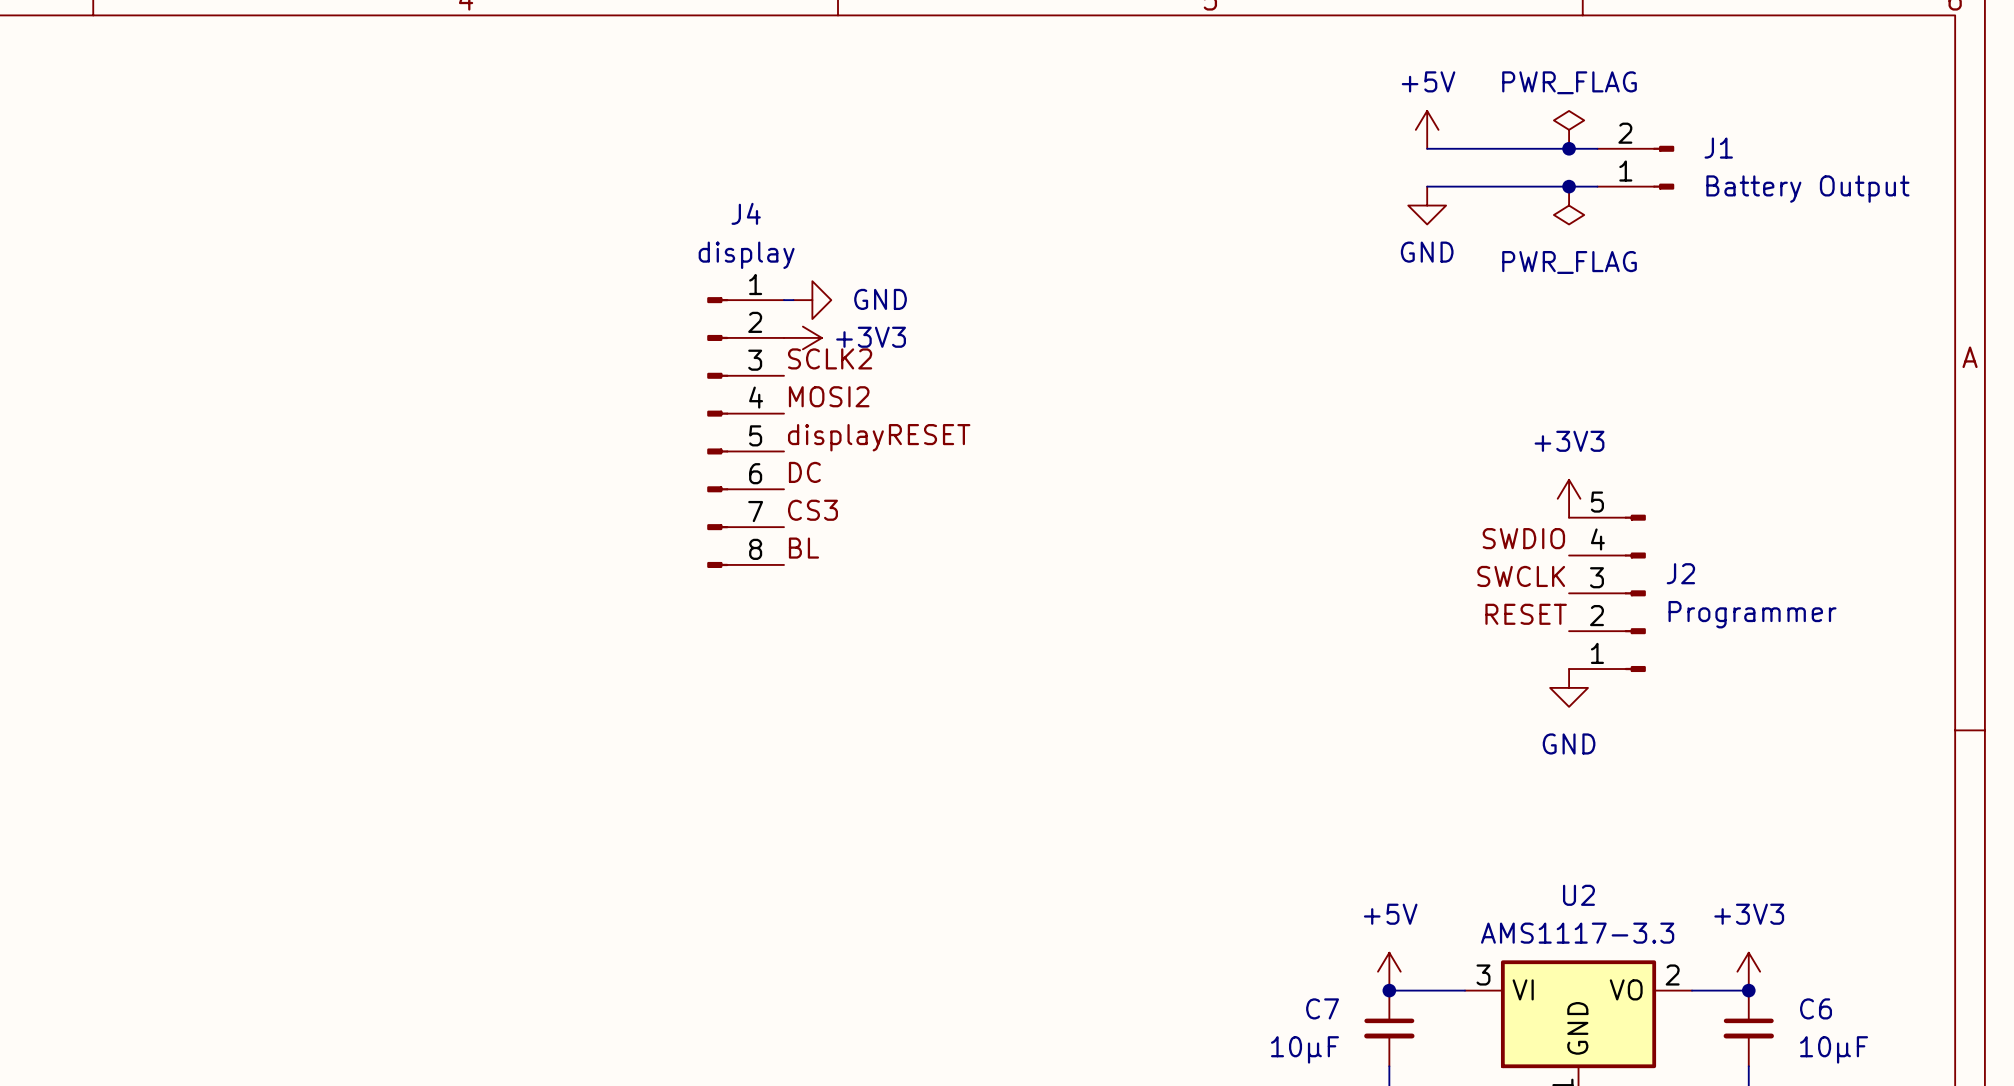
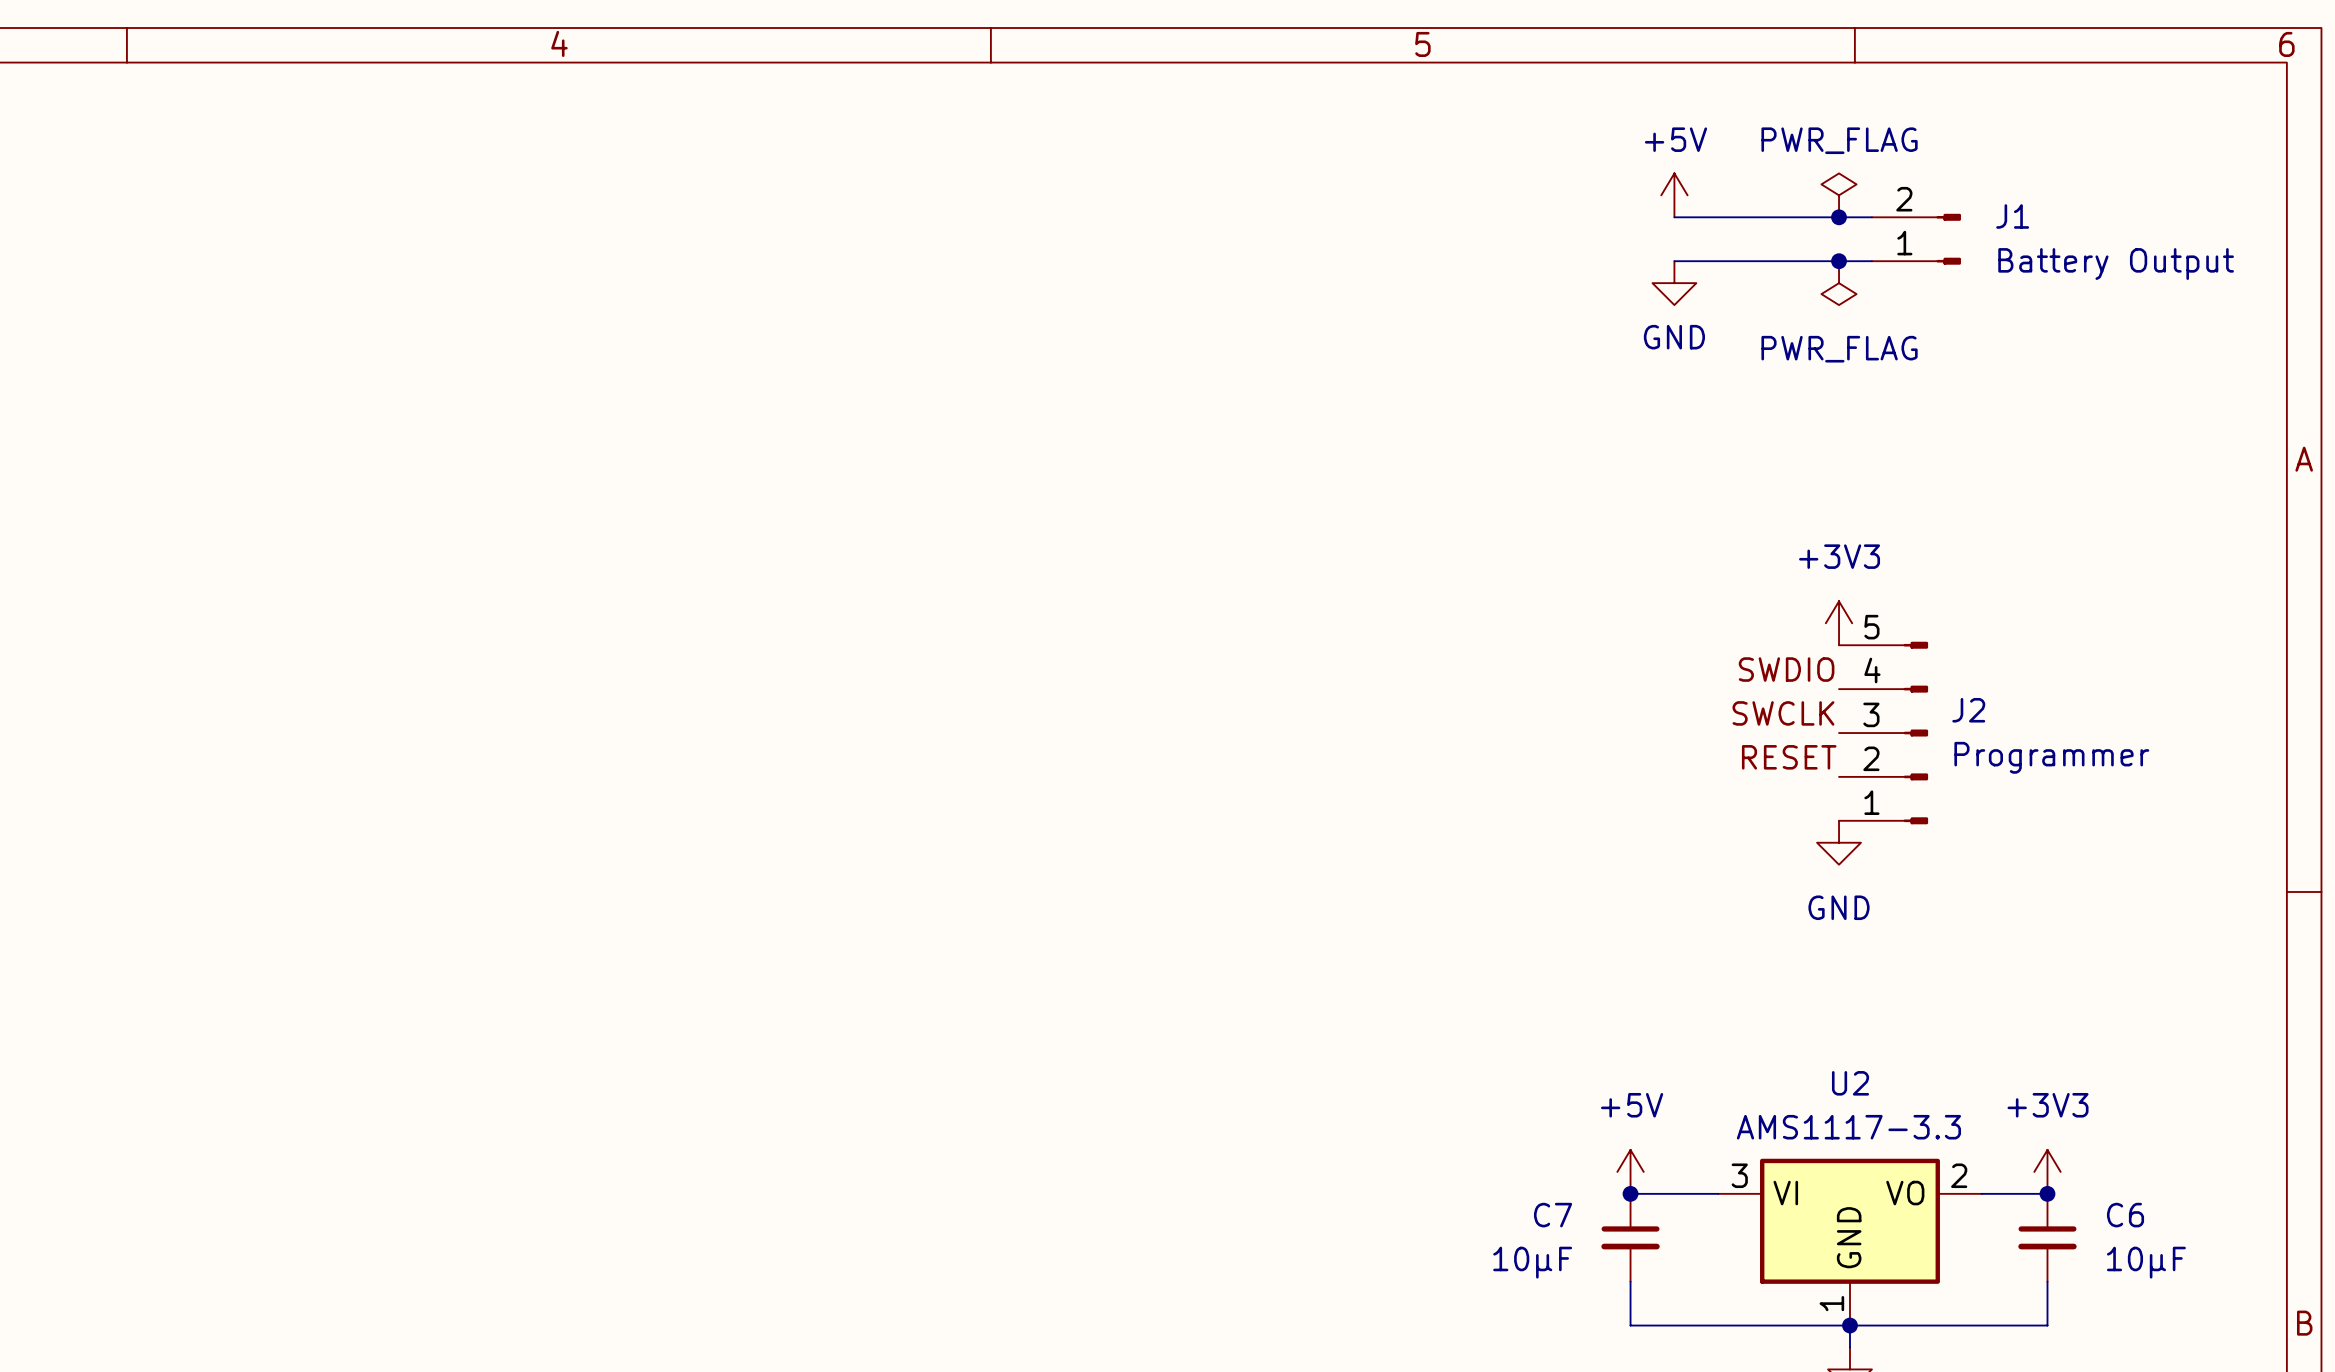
wire: (784, 300) (793, 300) -> none
power symbol: GND (812, 300) -> none
power symbol: +3V3 (802, 337) -> none
label: SCLK2 (830, 358) -> none
label: MOSI2 (829, 396) -> none
J4: display (745, 432) -> none
label: displayRESET (879, 437) -> none
label: DC (804, 472) -> none
label: CS3 (812, 510) -> none
label: BL (803, 548) -> none

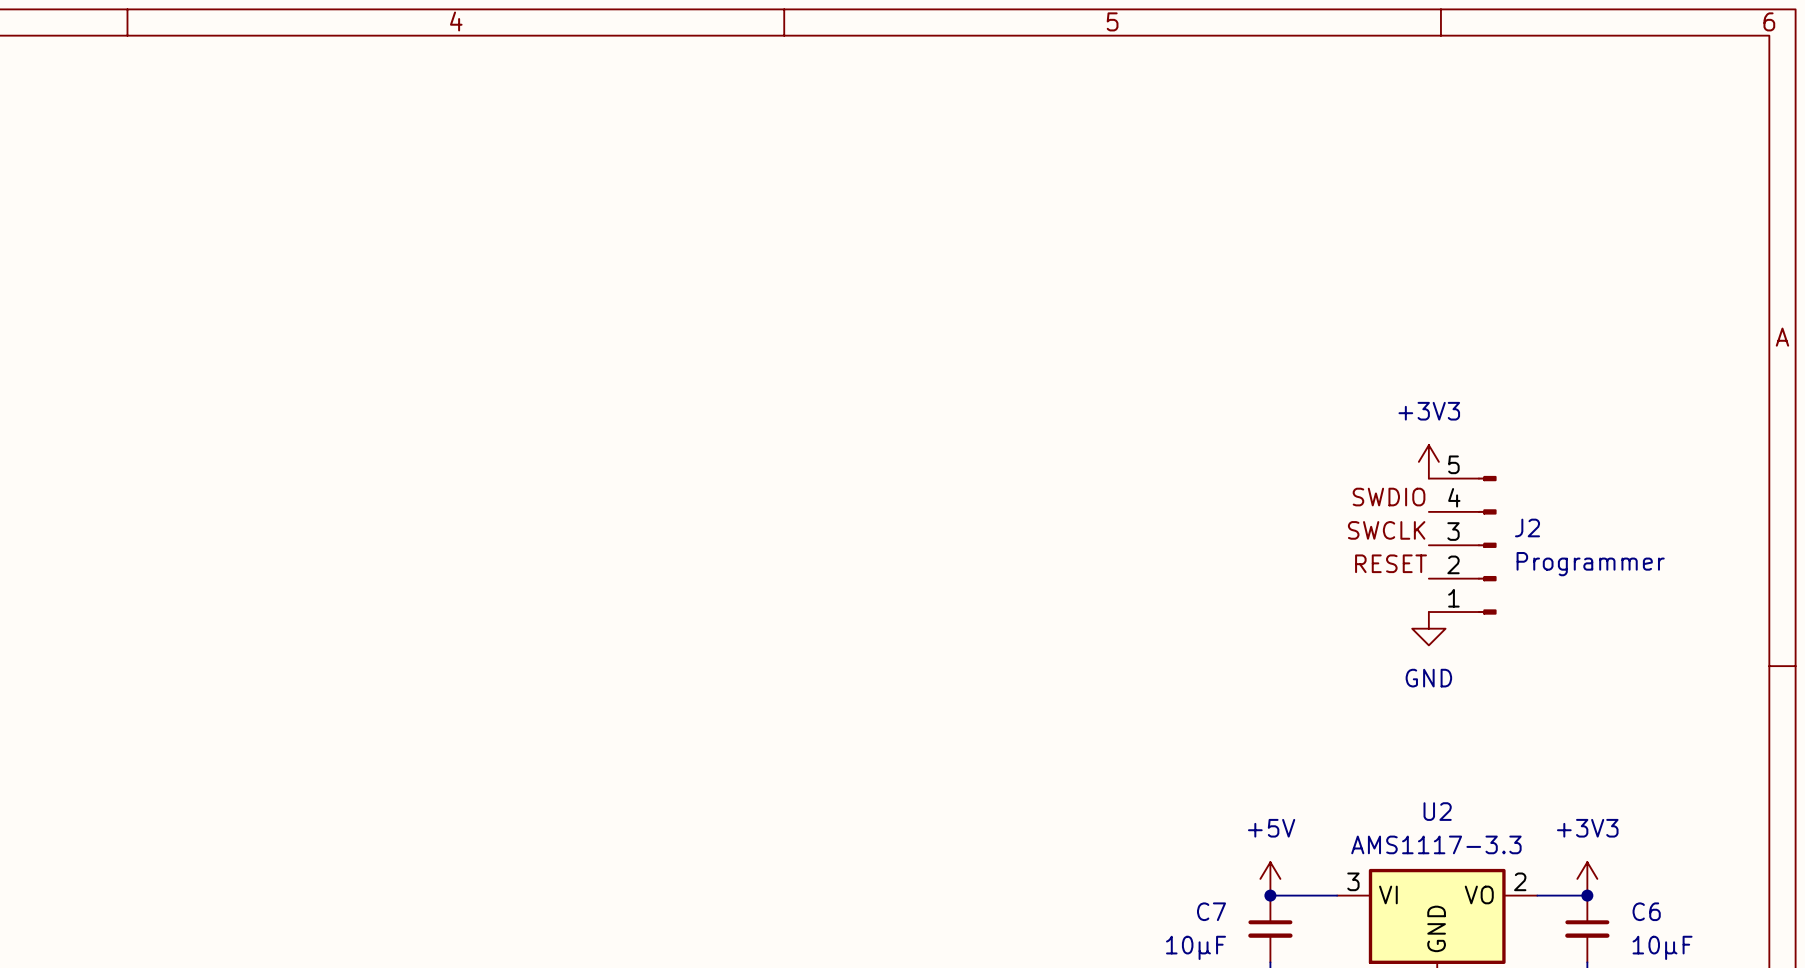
power symbol: +5V (1674, 195) -> none
power symbol: PWR_FLAG (1839, 195) -> none
wire: (1674, 217) (1871, 217) -> none
junction: (1839, 217) -> none
J1: Battery Output (1916, 239) -> none
wire: (1674, 261) (1871, 261) -> none
junction: (1839, 261) -> none
power symbol: GND (1674, 283) -> none
power symbol: PWR_FLAG (1839, 283) -> none

